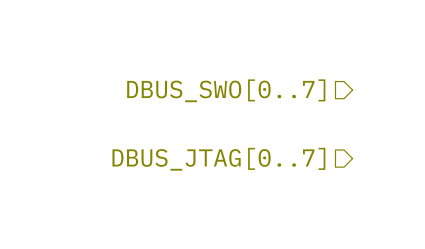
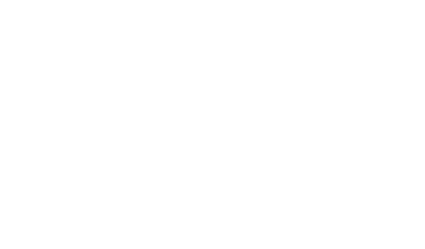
hierarchical label: DBUS_SWO[0..7] (226, 90) -> none
hierarchical label: DBUS_JTAG[0..7] (218, 159) -> none

